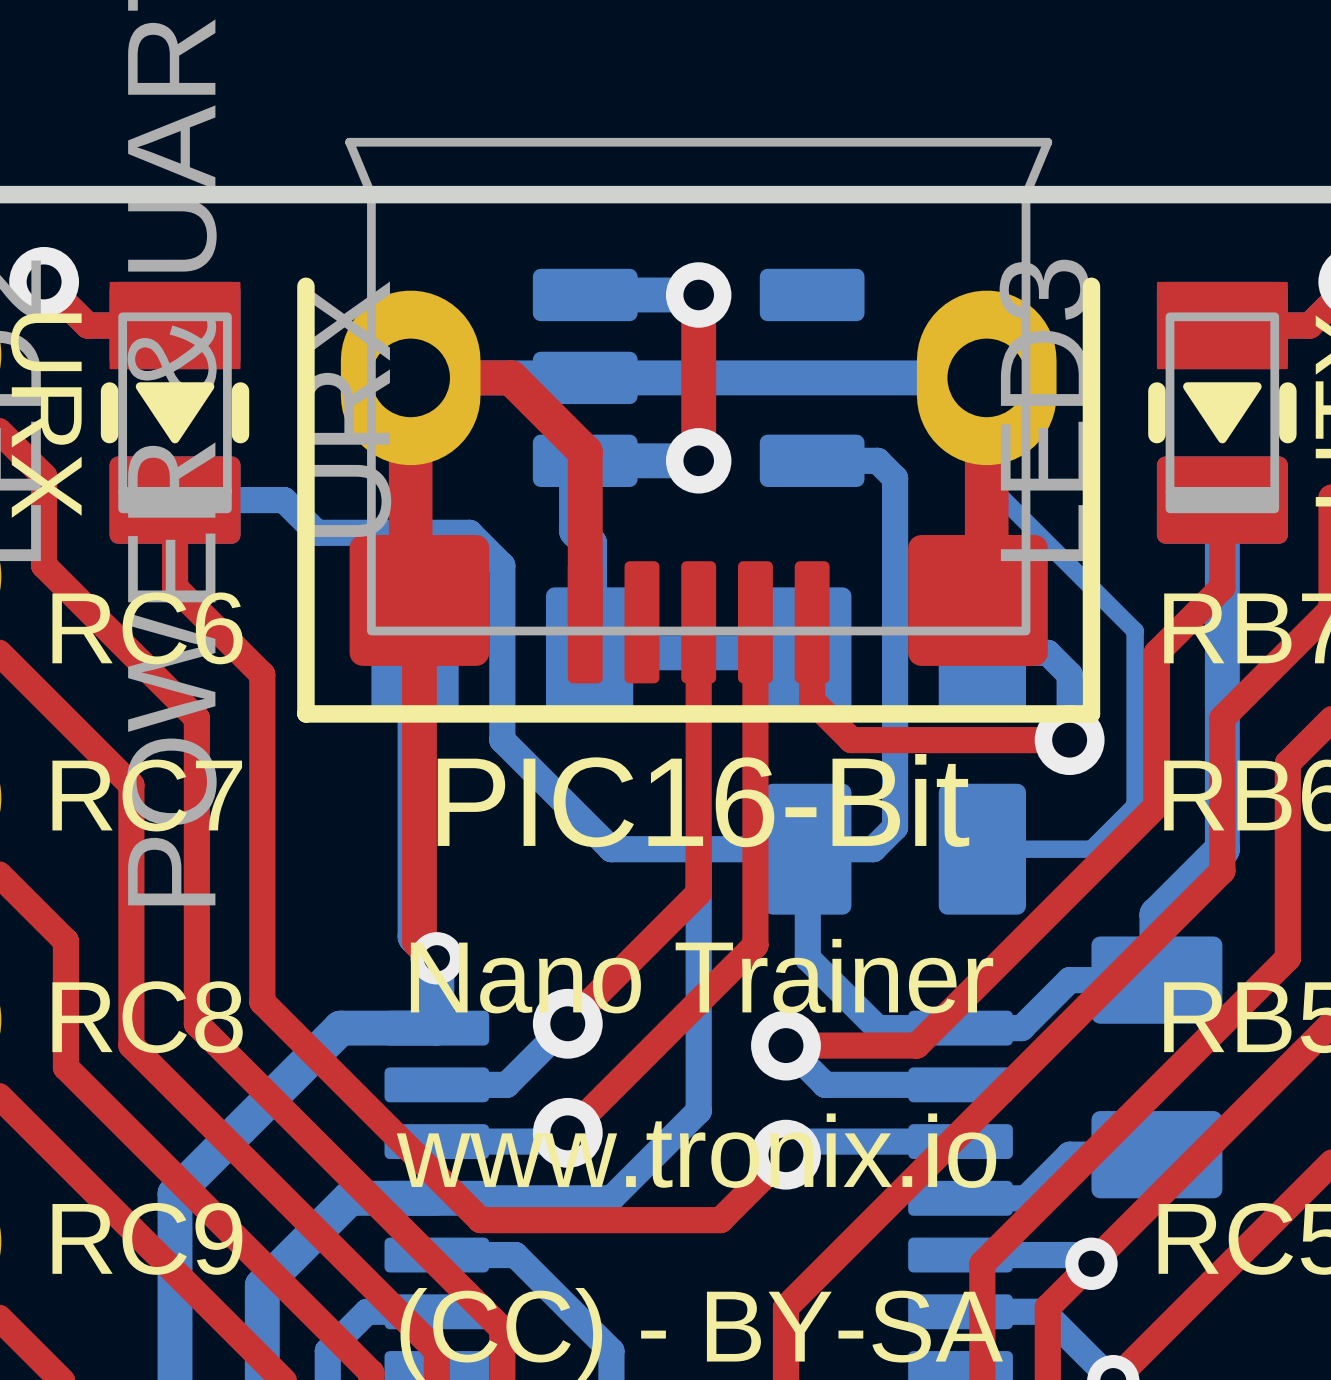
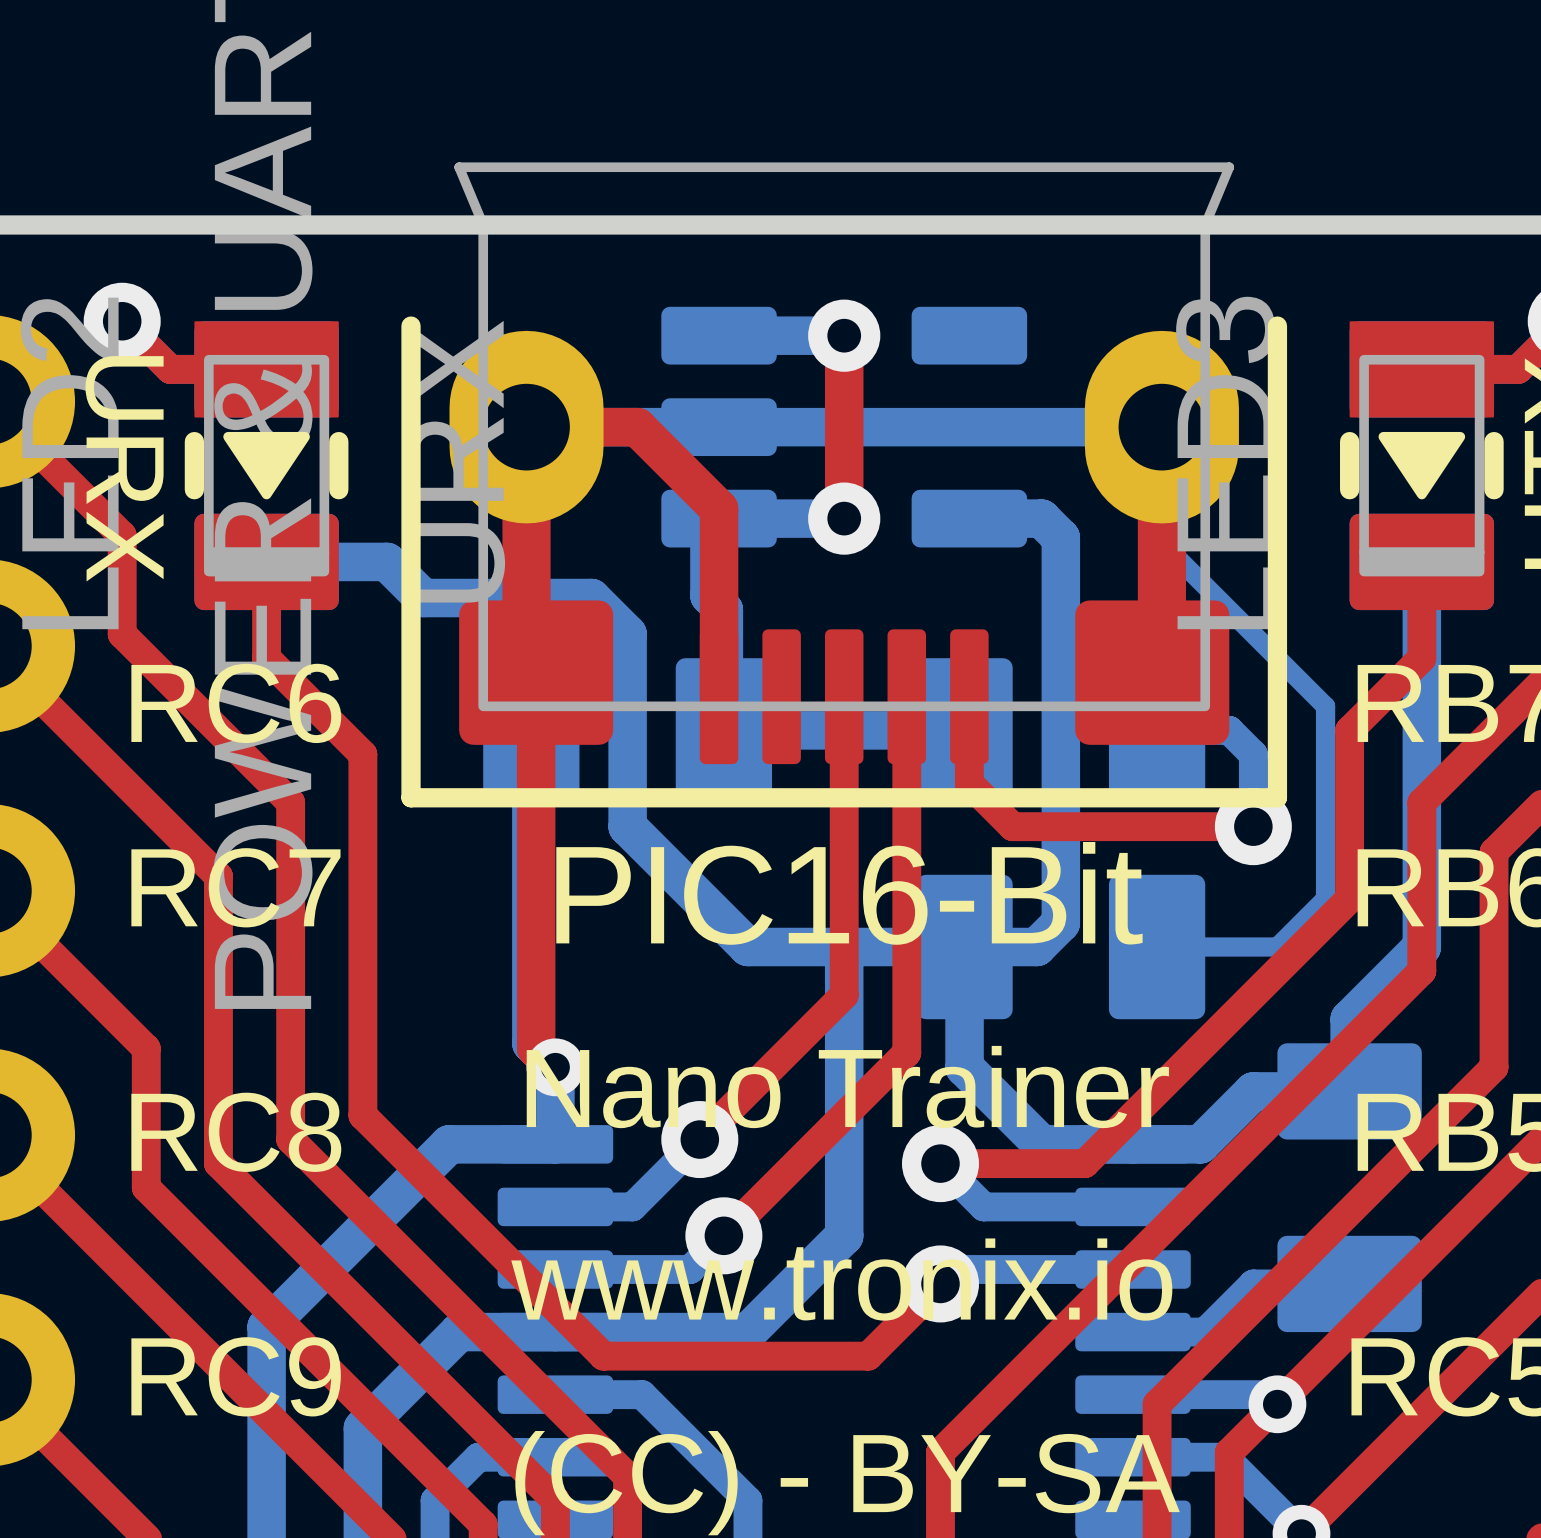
bottom track width: thin (812, 460) (877, 460) (895, 478) (895, 827) (873, 849) (611, 849) (502, 740) (502, 565) (469, 532) (316, 532) (284, 500) (175, 500) -> thick (969, 518) (1041, 518) (1060, 537) (1060, 922) (1036, 947) (747, 947) (627, 826) (627, 634) (591, 598) (423, 598) (386, 561) (266, 561)
bottom track width: thin (698, 849) (698, 1111) (611, 1198) (436, 1198) -> thick (844, 947) (844, 1235) (747, 1332) (555, 1332)
bottom track width: thin (807, 849) (807, 958) (877, 1028) (1021, 1028) (1069, 980) (1156, 980) -> thick (964, 947) (964, 1067) (1041, 1144) (1200, 1144) (1253, 1091) (1349, 1091)
via position: (567, 1132) -> (723, 1235)

